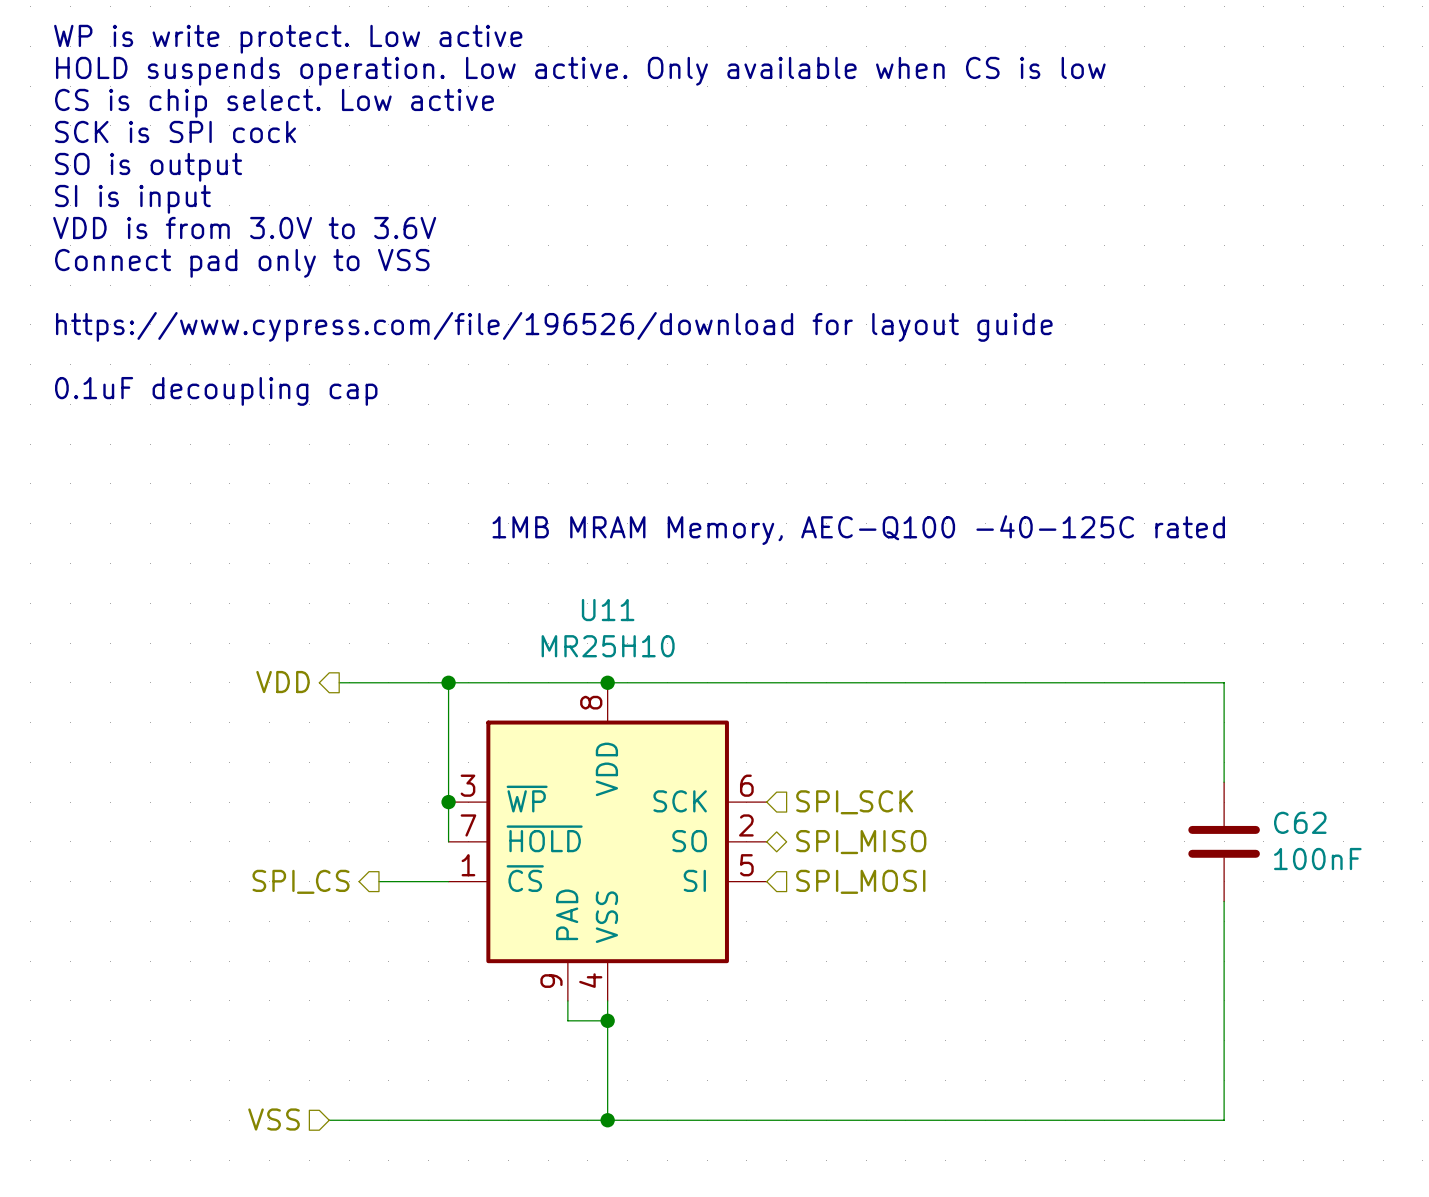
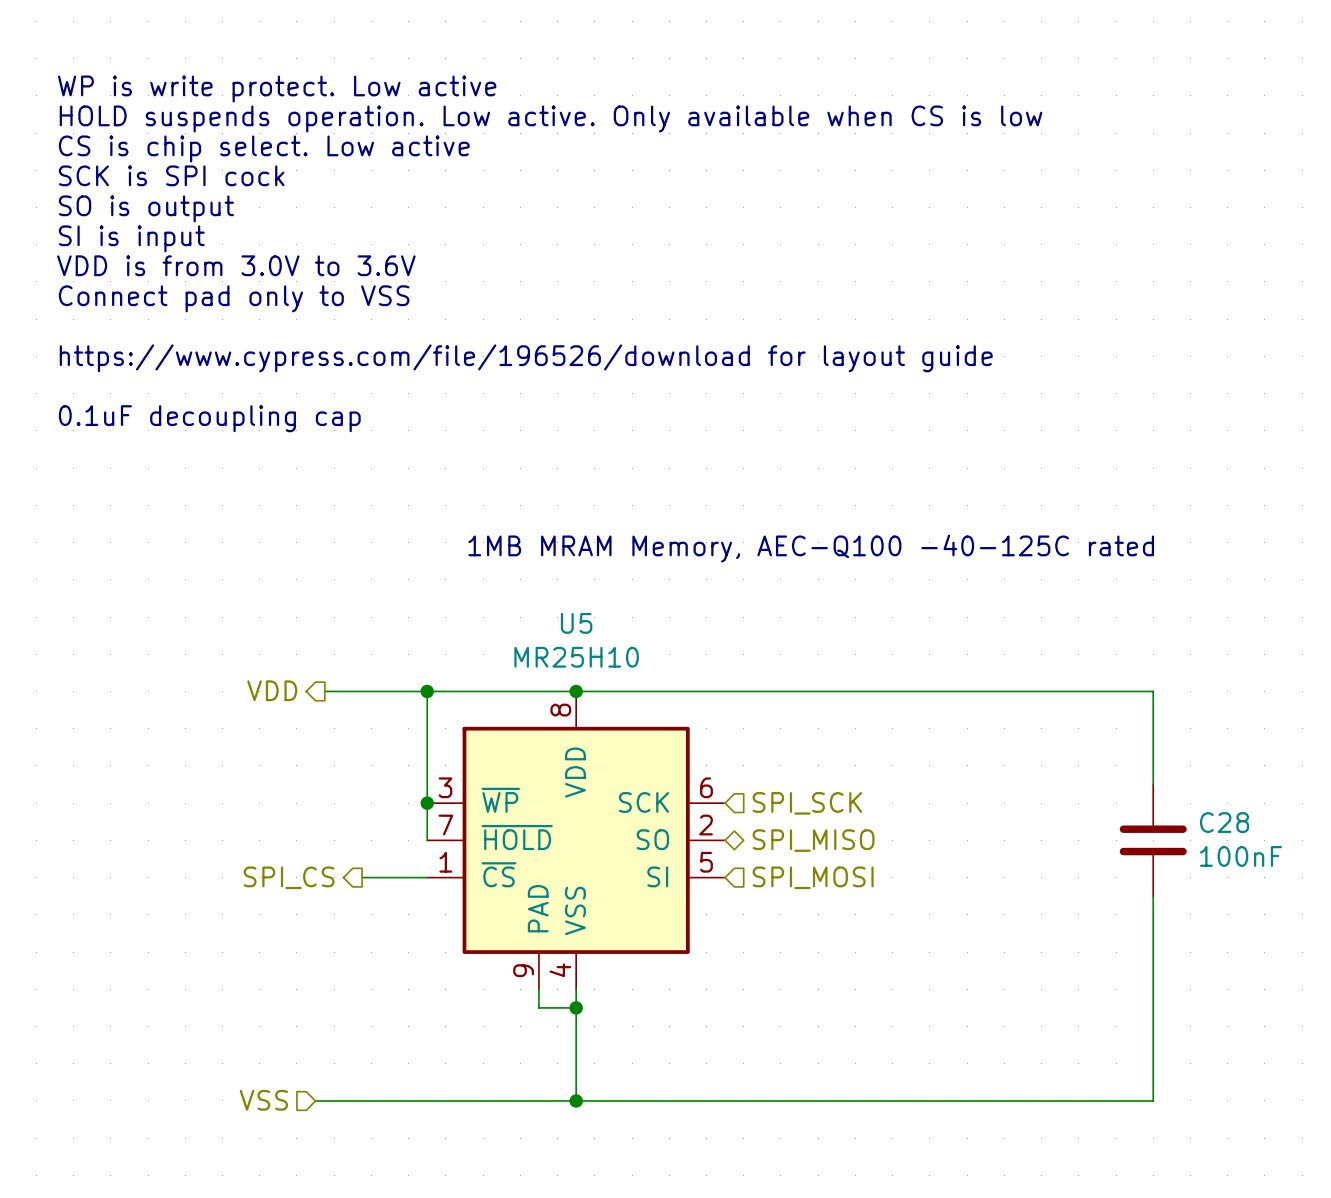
U11 name: U11 (608, 610) -> U5 (576, 623)
C62 name: C62 (1300, 822) -> C28 (1224, 822)

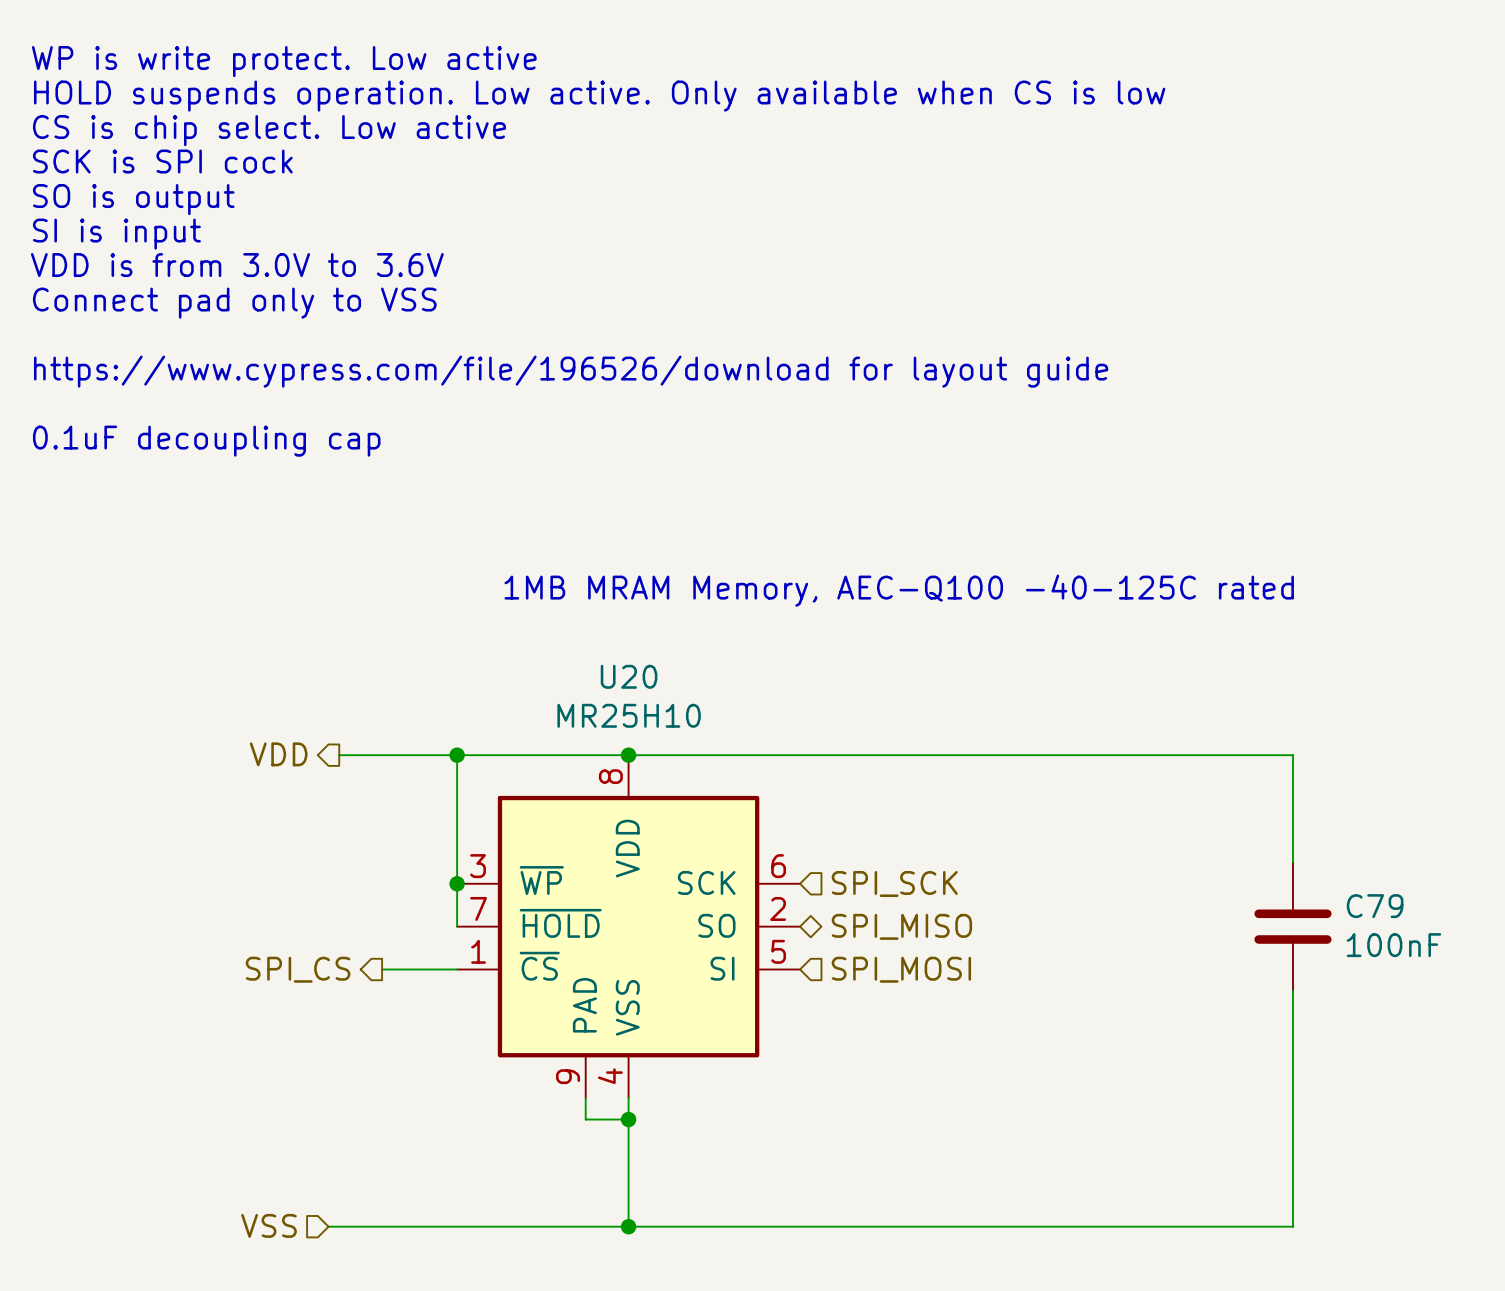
U5 name: U5 (576, 623) -> U20 (629, 676)
C28 name: C28 (1224, 822) -> C79 (1375, 906)

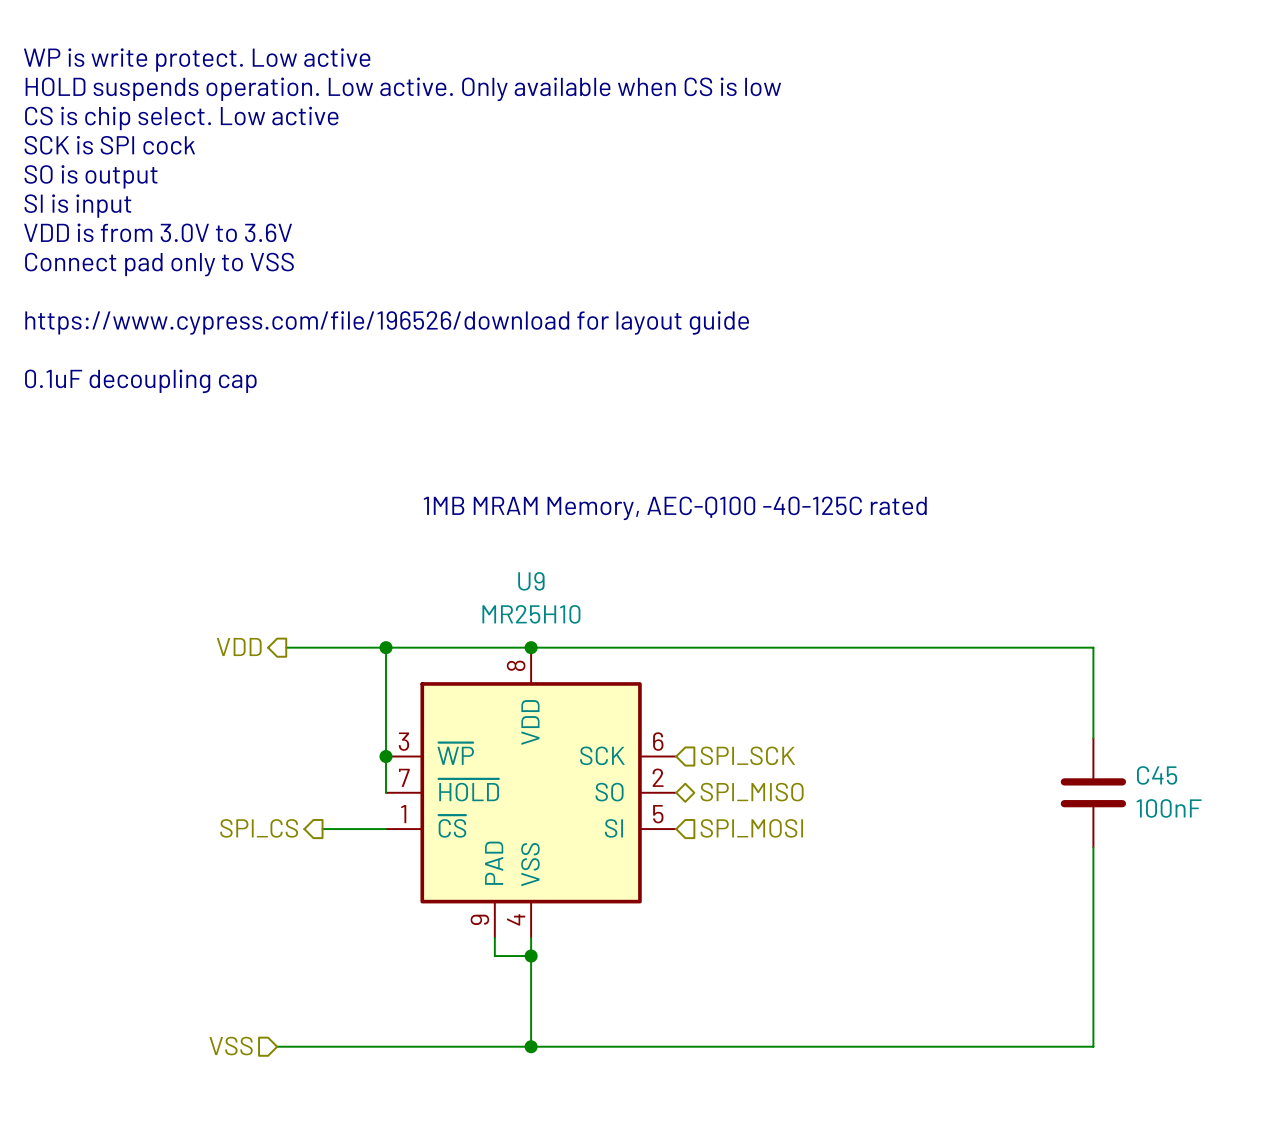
U20 name: U20 (629, 676) -> U9 (531, 581)
C79 name: C79 (1375, 906) -> C45 (1157, 775)

